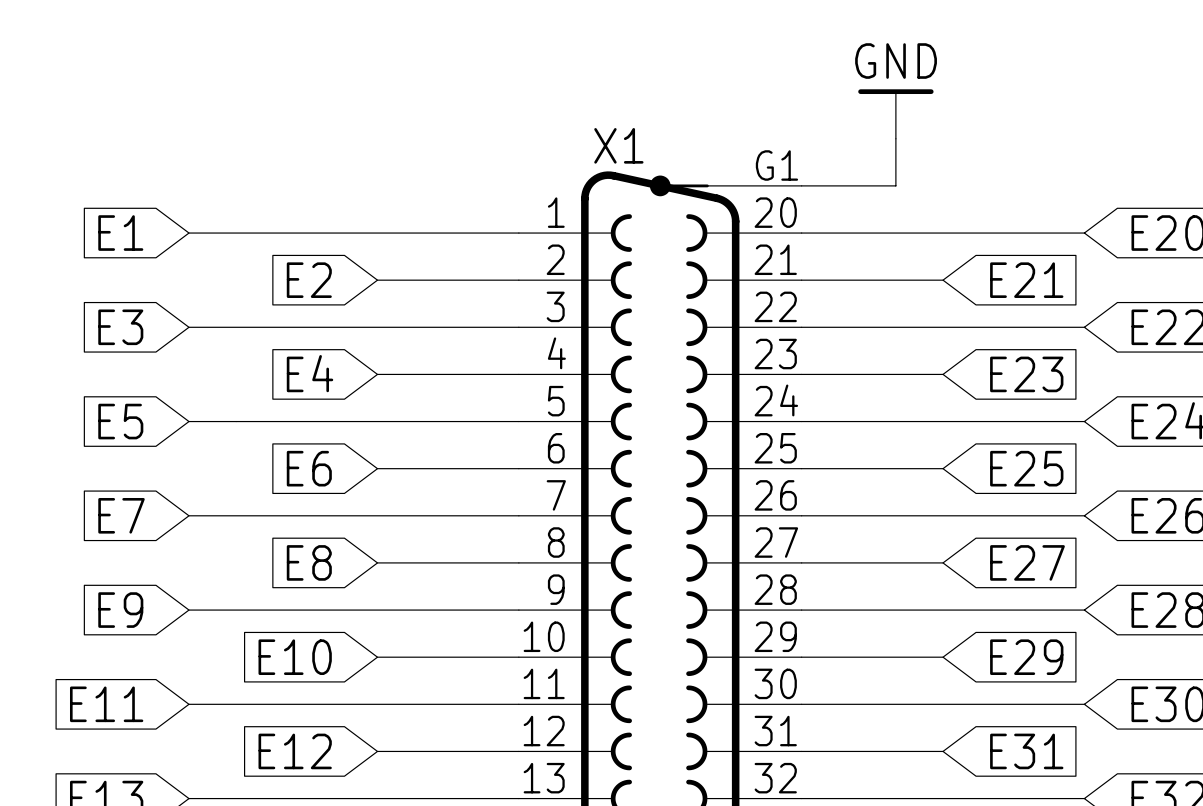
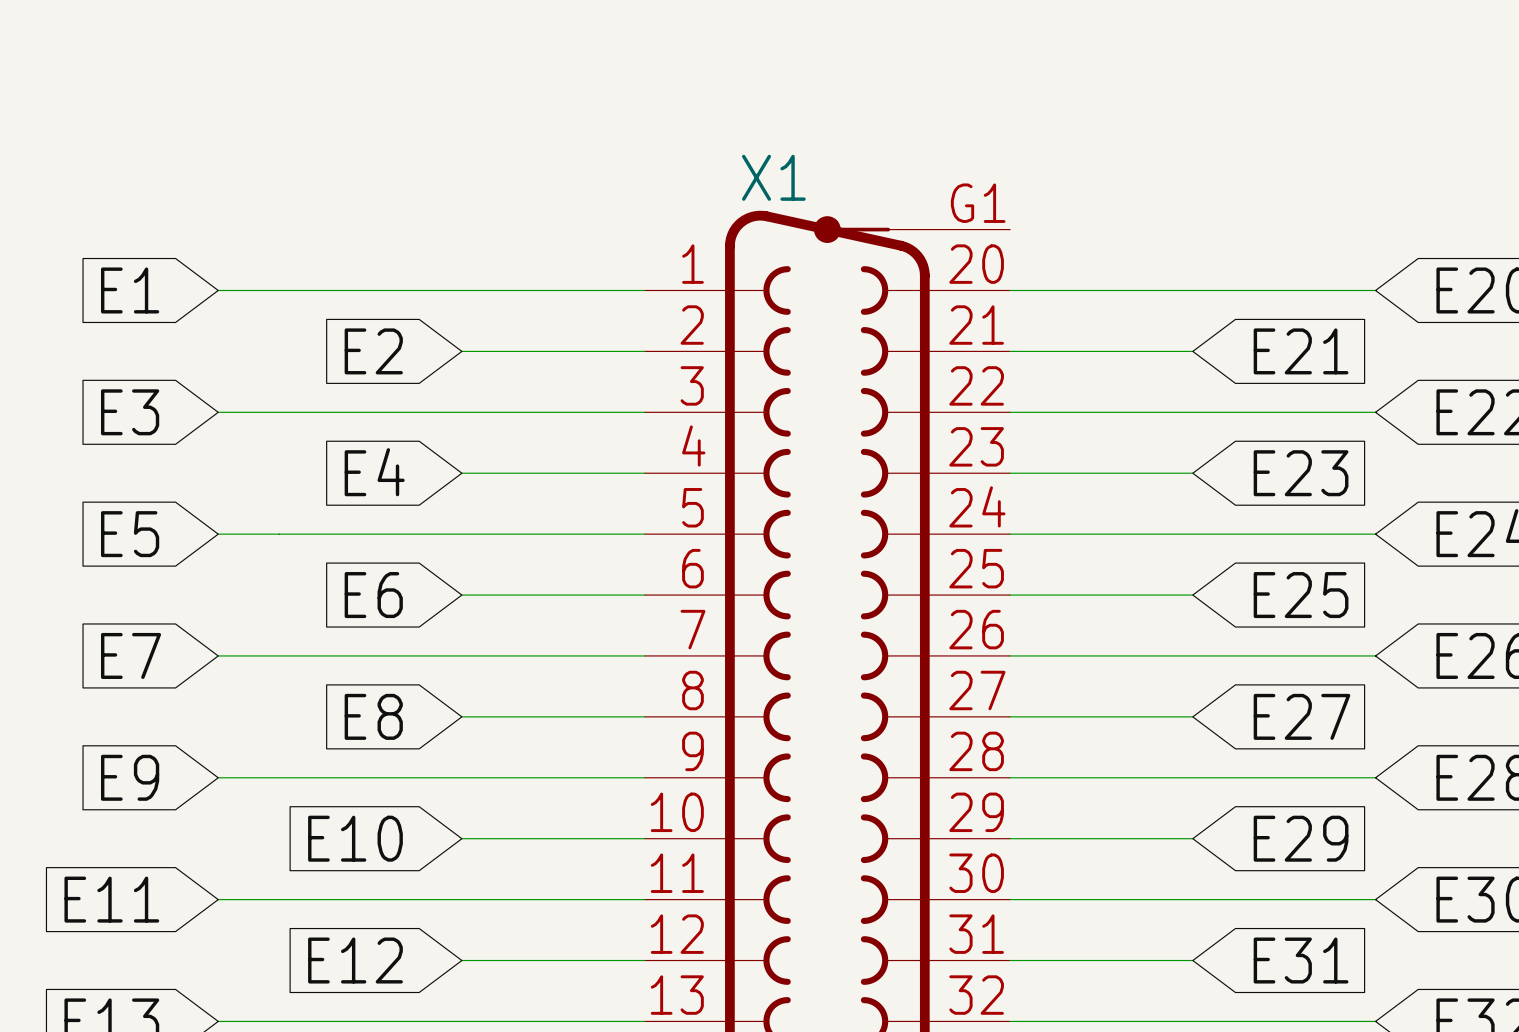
power symbol: GND (895, 114) -> none
wire: (895, 138) (895, 185) (801, 185) -> none

